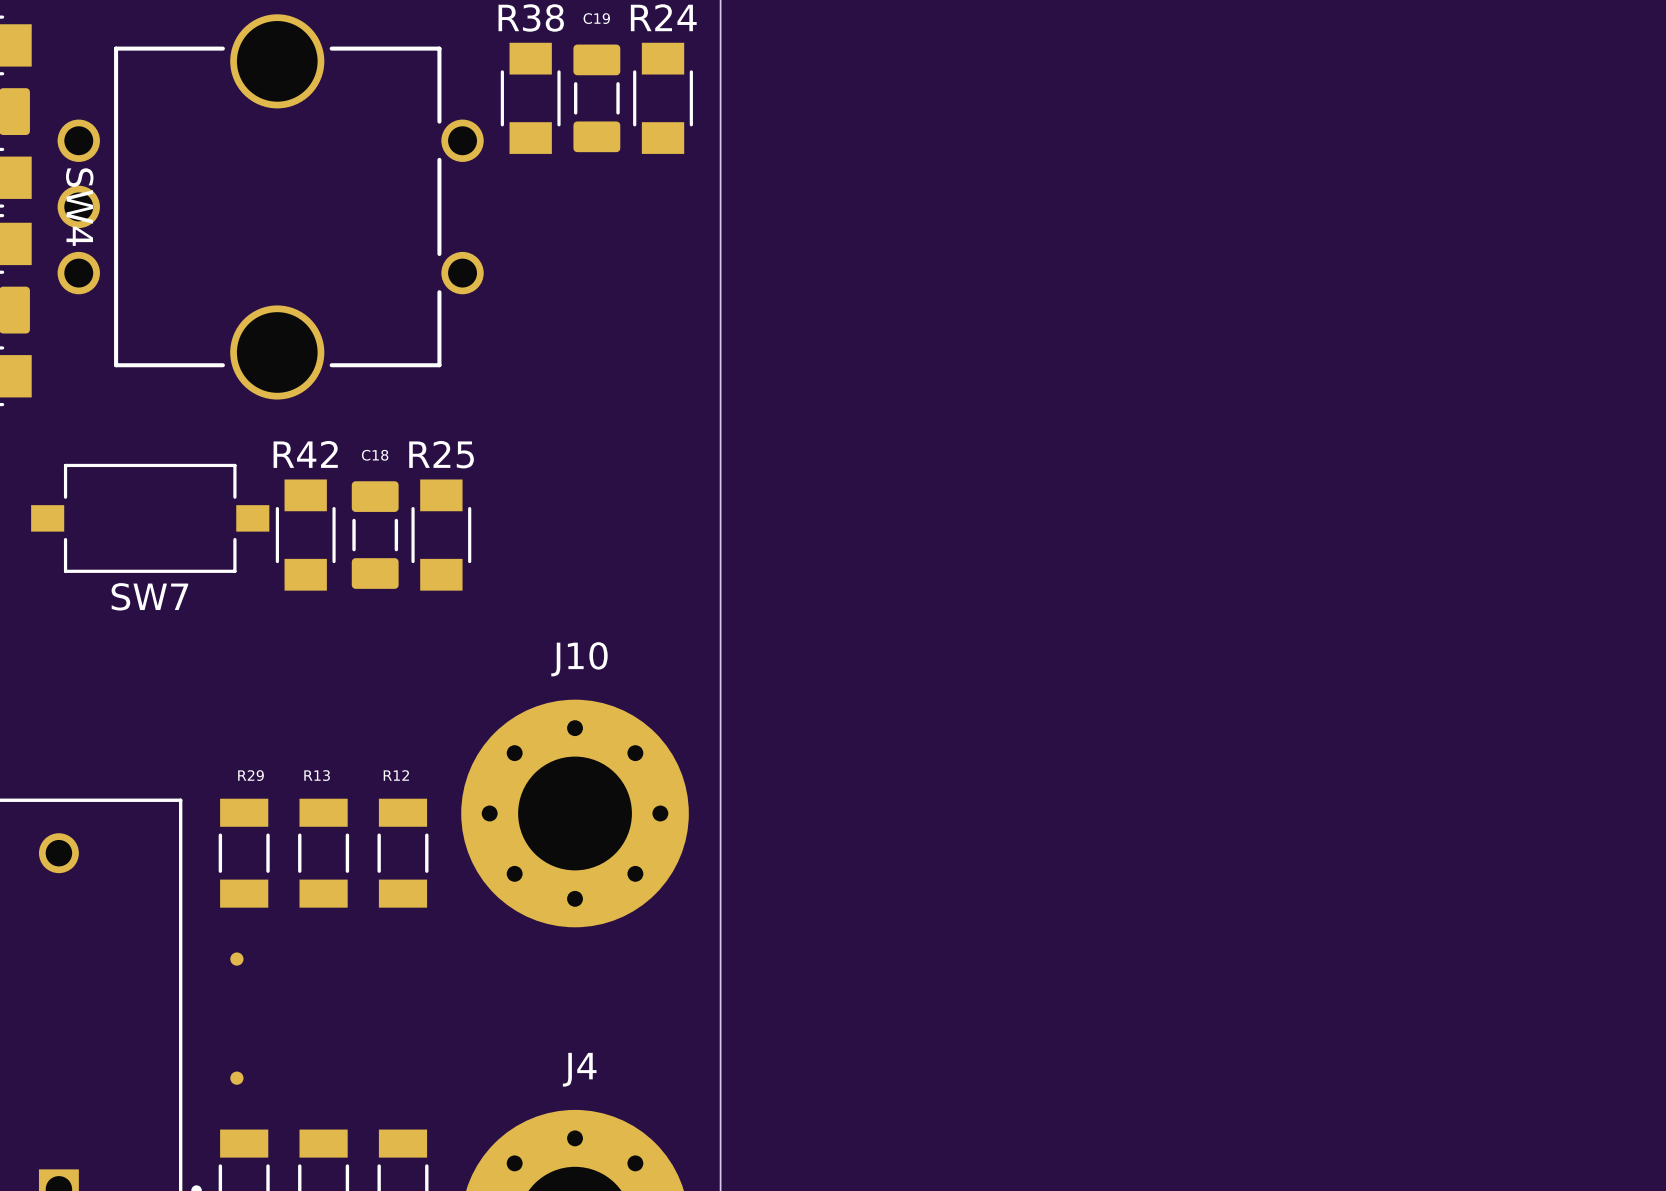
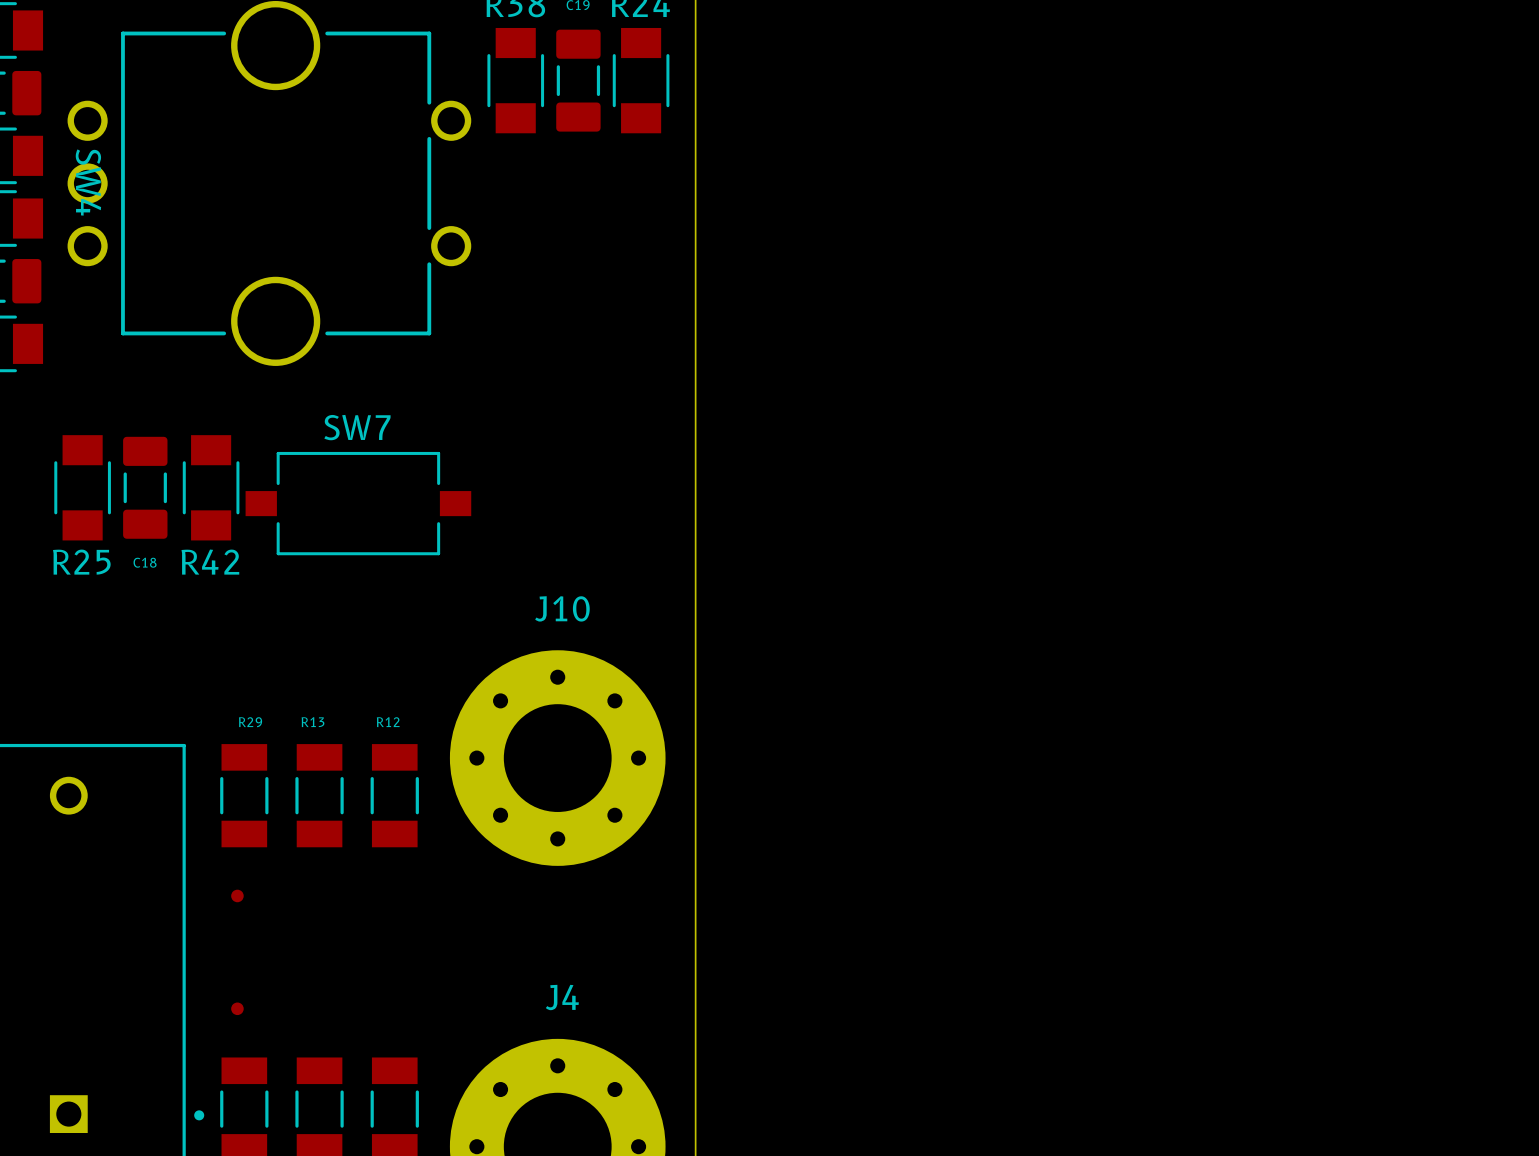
R42 name position: R42 (305, 454) -> R42 (210, 562)
R25 name position: R25 (441, 454) -> R25 (81, 562)
C18 name position: C18 (375, 455) -> C18 (145, 562)
SW7 position: (150, 518) -> (358, 503)
R42 position: (305, 535) -> (211, 487)
C18 position: (375, 535) -> (145, 487)
R25 position: (441, 535) -> (82, 487)
SW7 name position: SW7 (149, 596) -> SW7 (357, 427)

